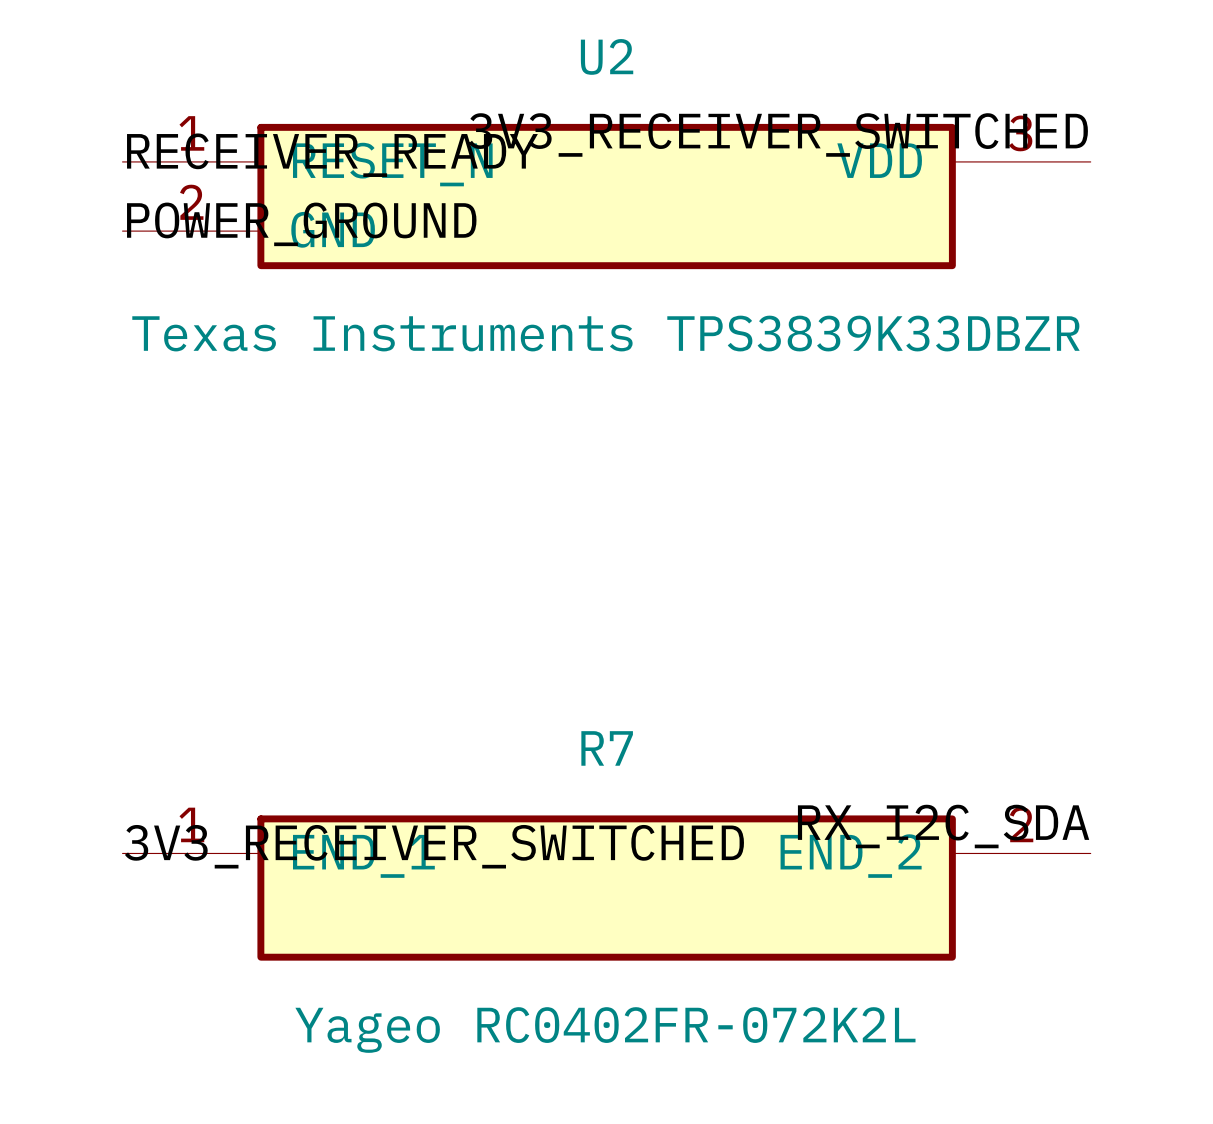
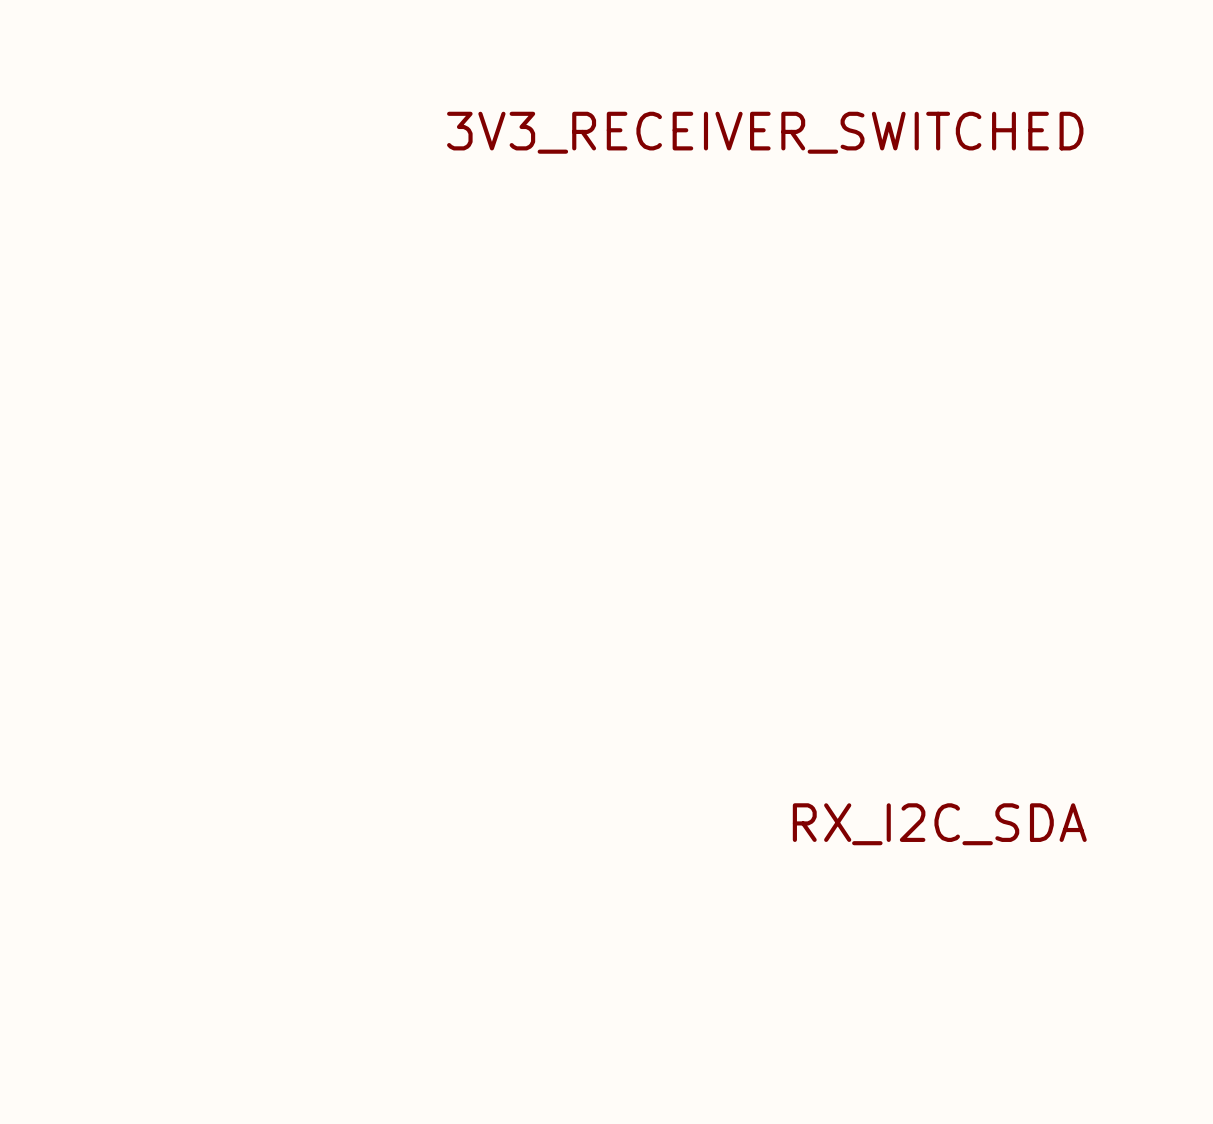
label: RECEIVER_READY (332, 155) -> none
U2: Texas Instruments TPS3839K33DBZR (606, 196) -> none
label: POWER_GROUND (301, 224) -> none
label: 3V3_RECEIVER_SWITCHED (434, 846) -> none
R7: Yageo RC0402FR-072K2L (606, 888) -> none

